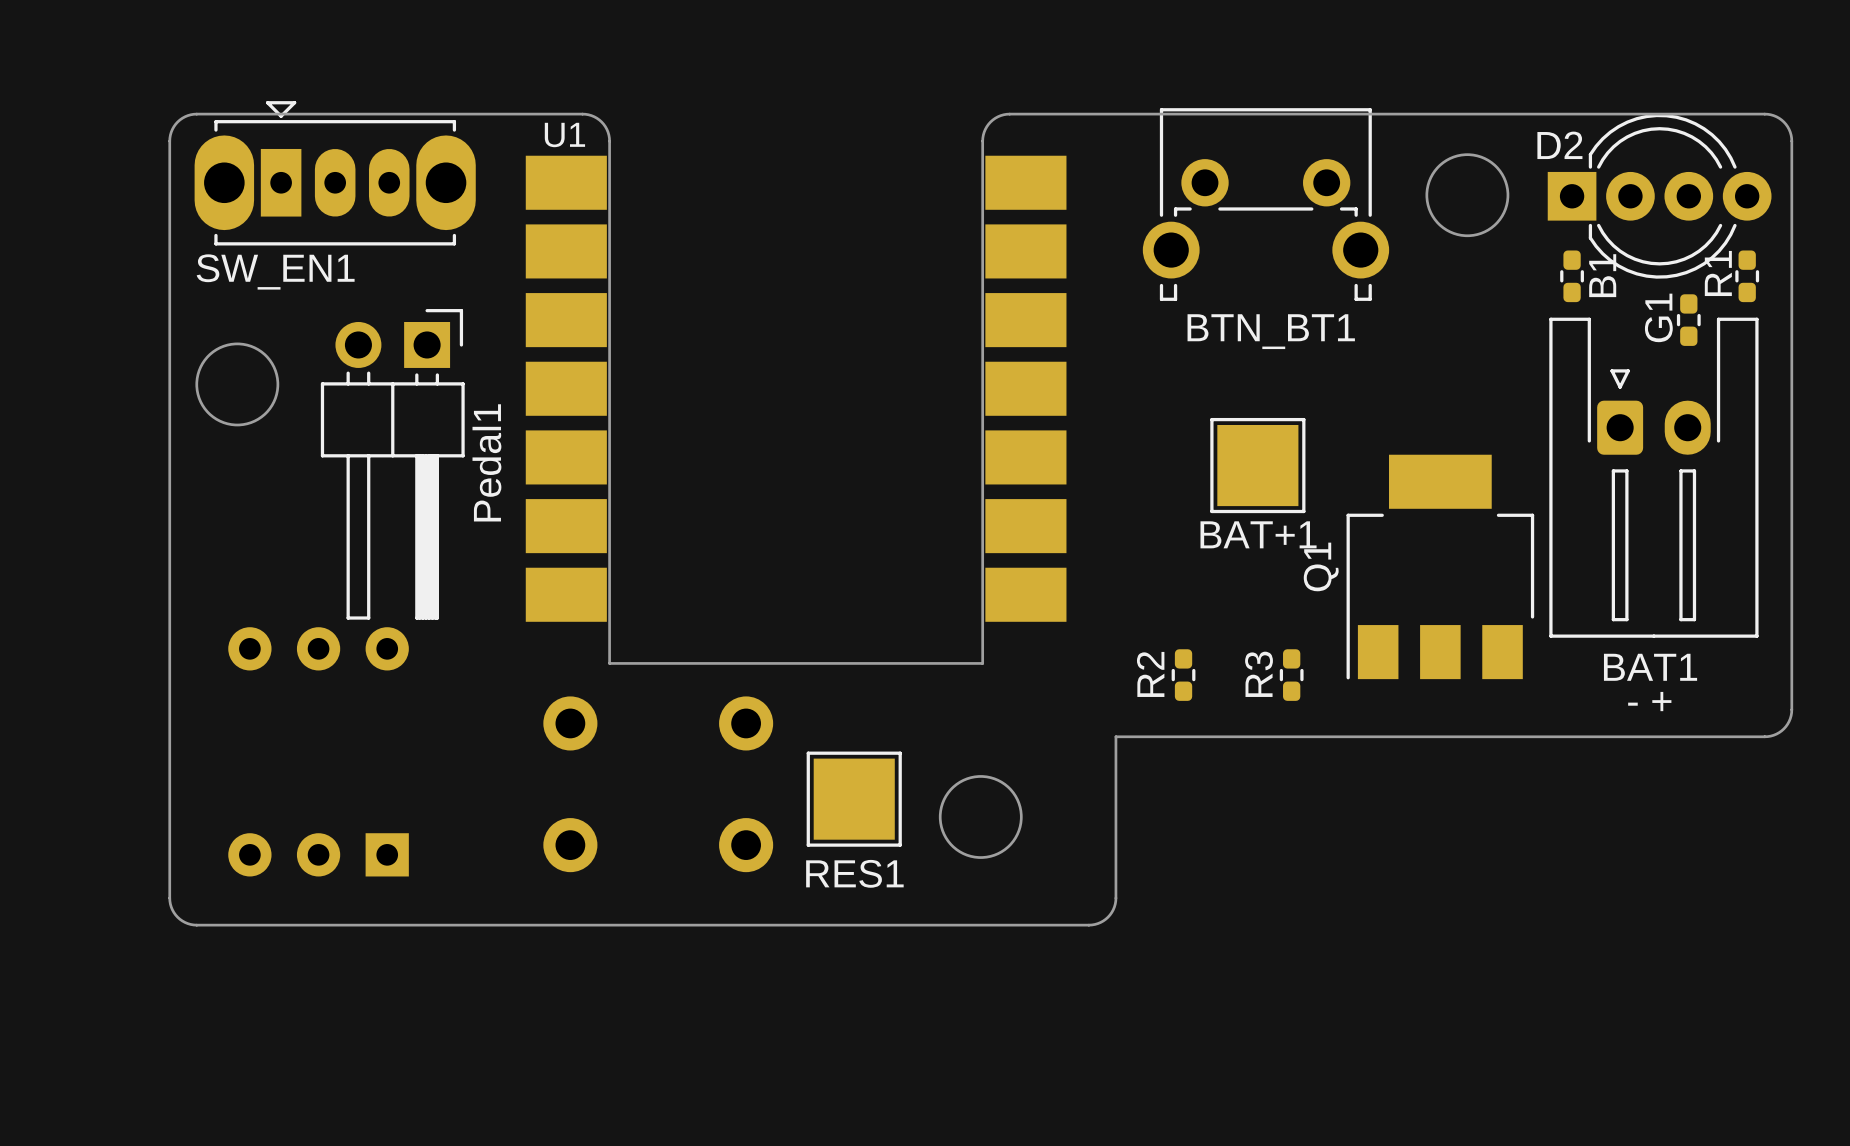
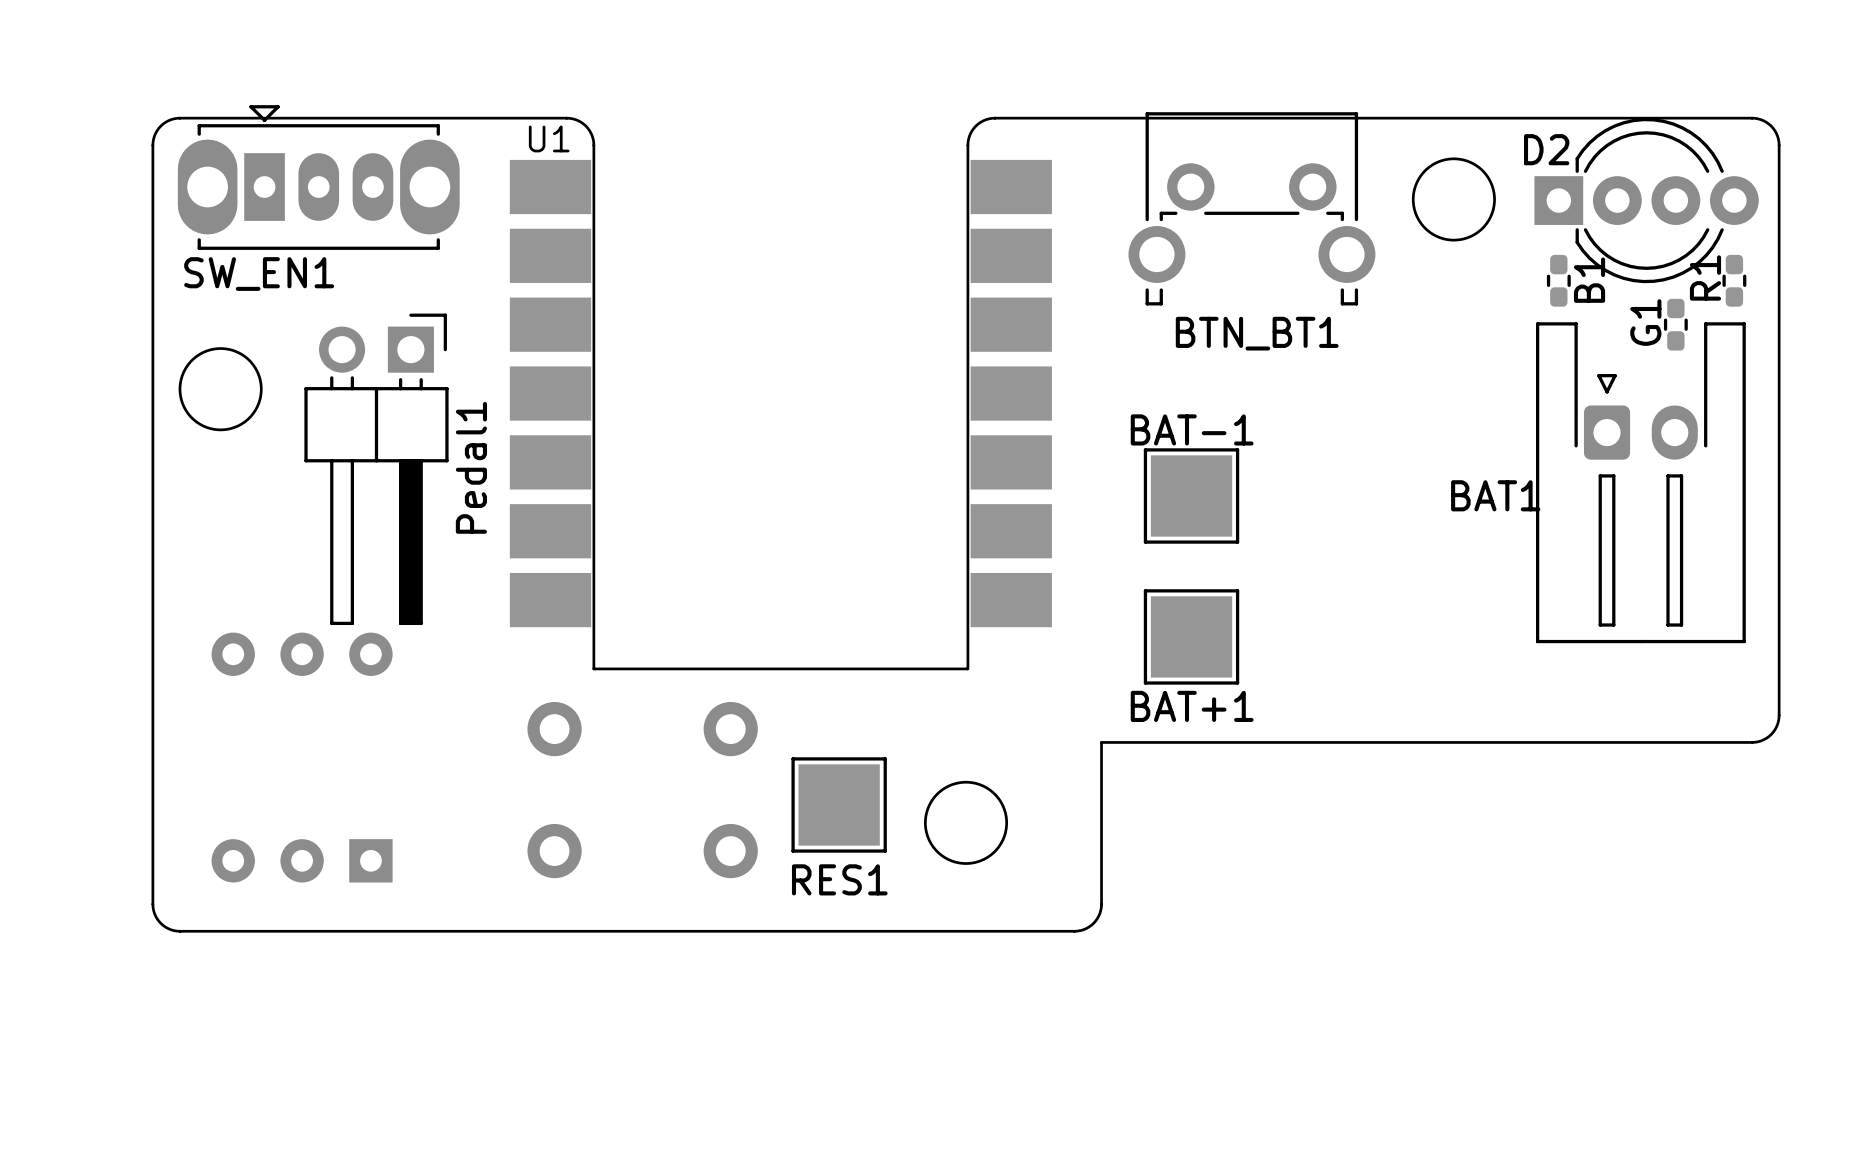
BAT+1 position: (1257, 465) -> (1191, 636)
BAT-1: none -> (1191, 495)
Q1: (1440, 567) -> none
BAT1 name position: BAT1 (1650, 667) -> BAT1 (1495, 495)
R2: (1183, 675) -> none
R3: (1291, 675) -> none
text: - + (1649, 701) -> none

